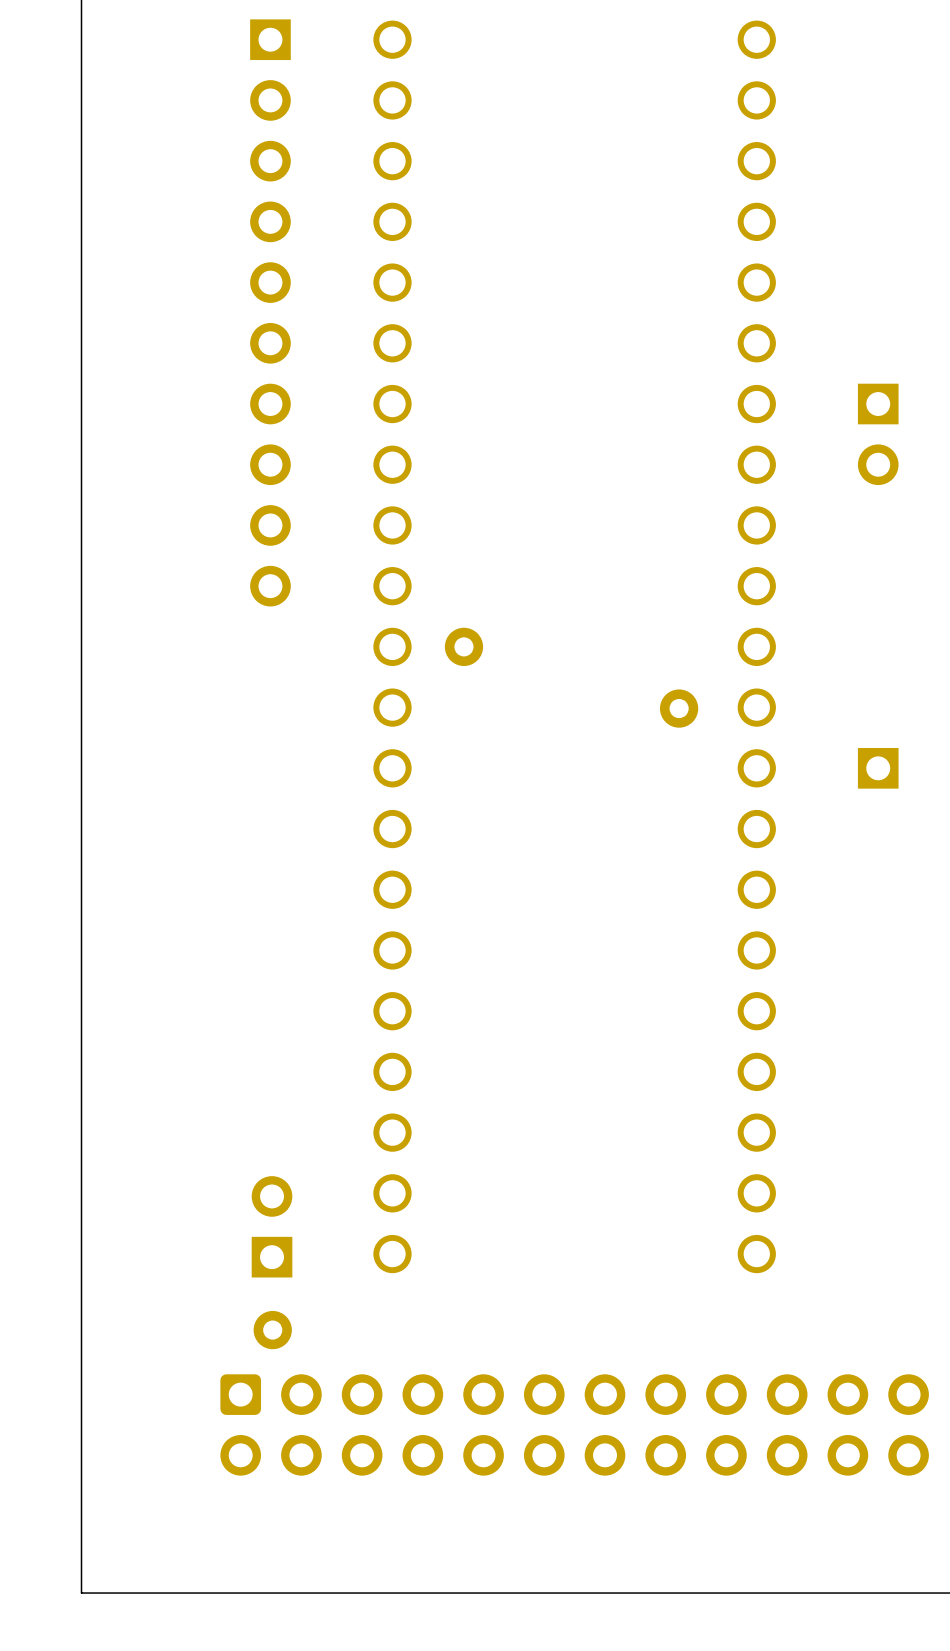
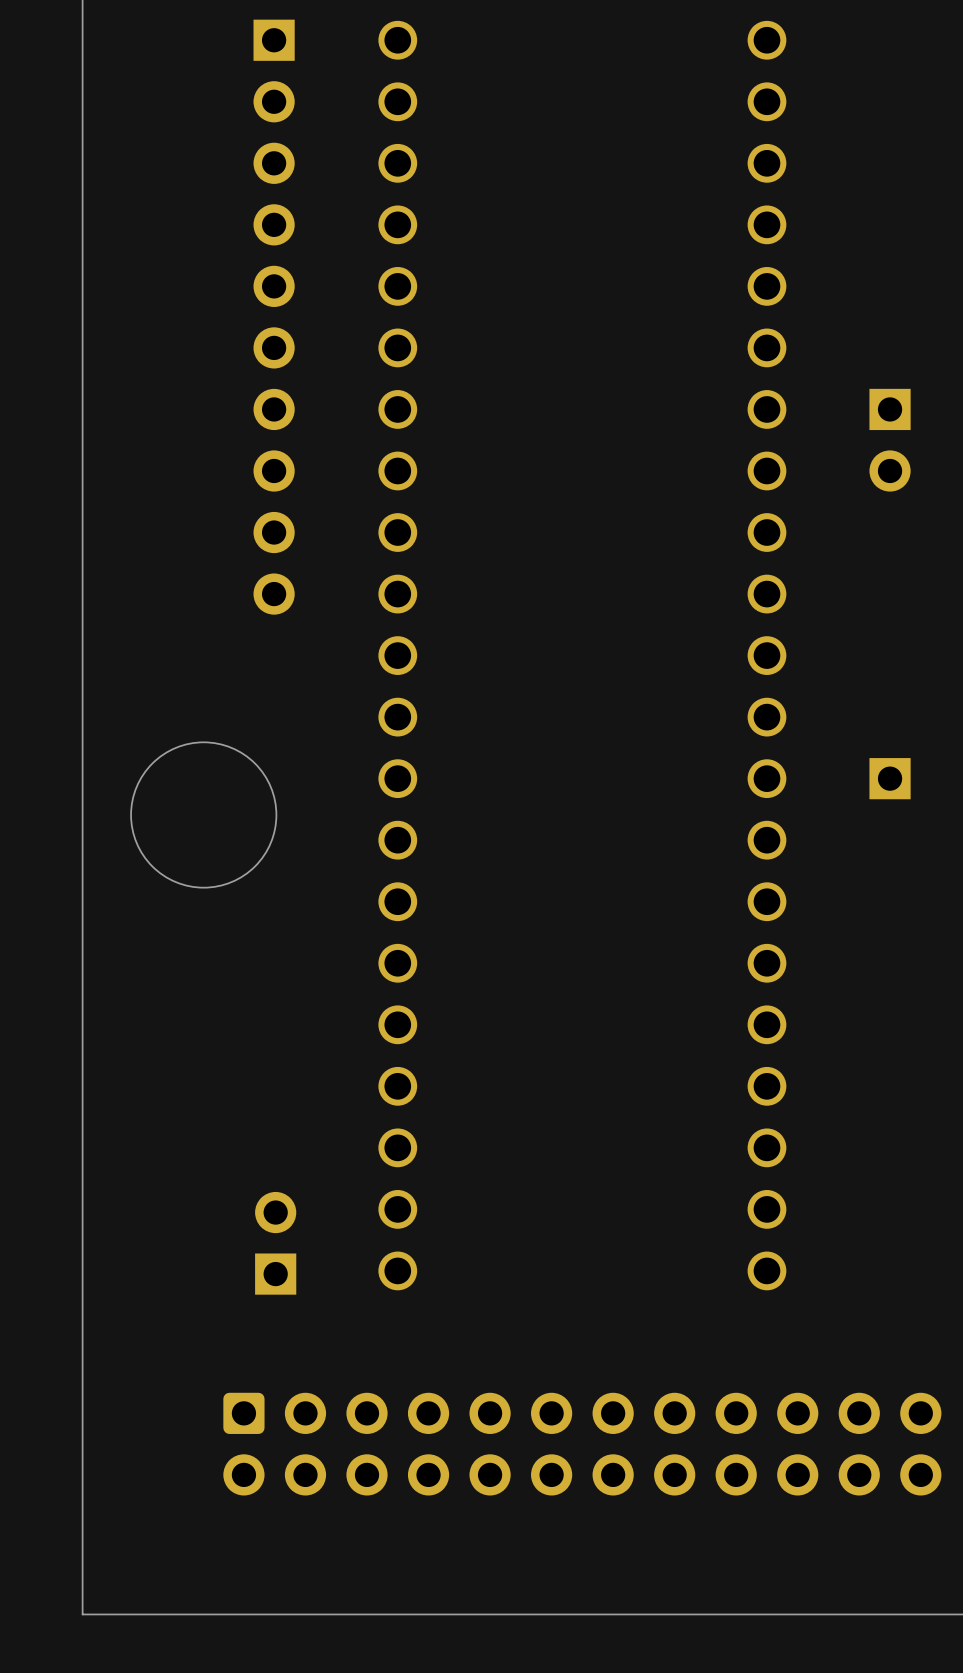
part: (463, 646) -> none
part: (679, 708) -> none
round board edge: none -> [130, 741, 278, 889]
part: (272, 1330) -> none

